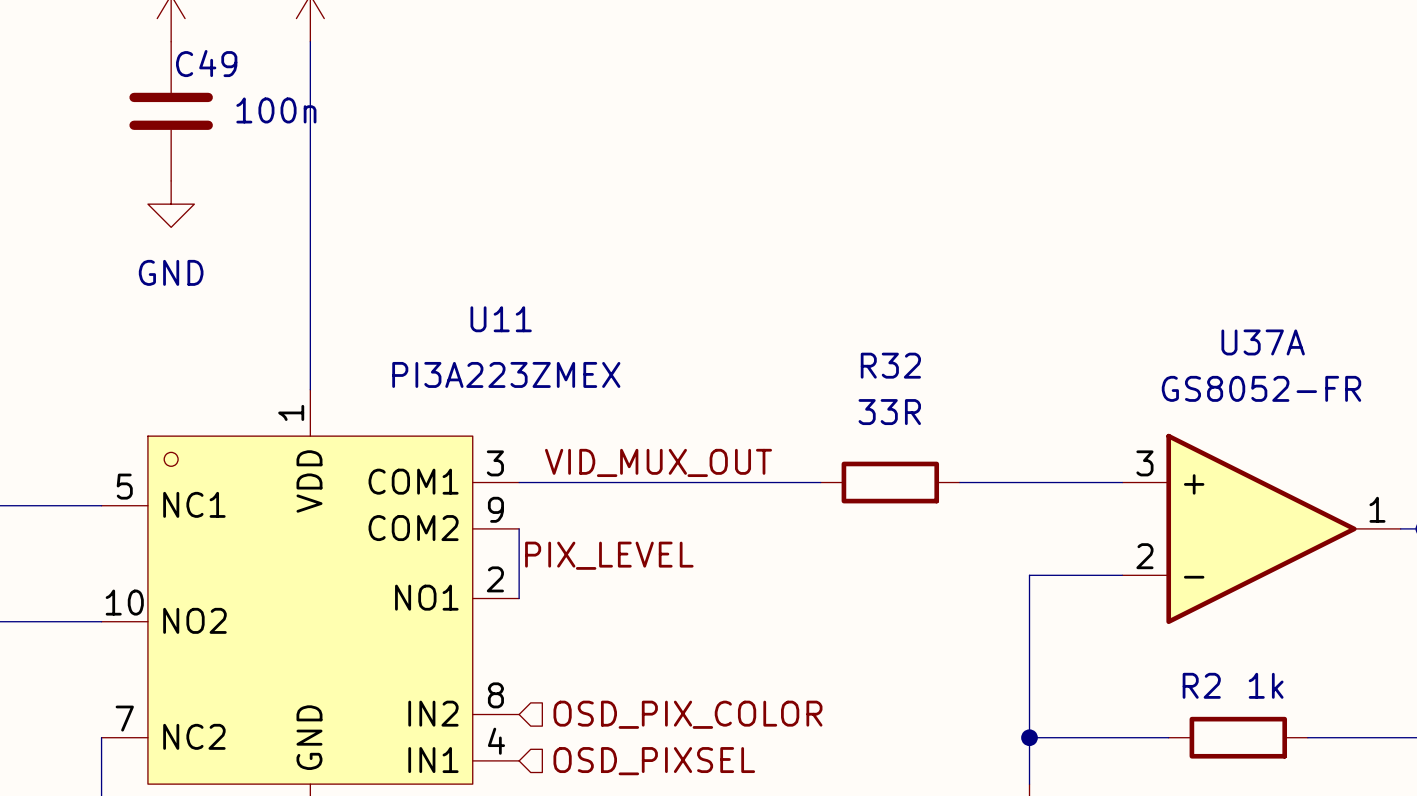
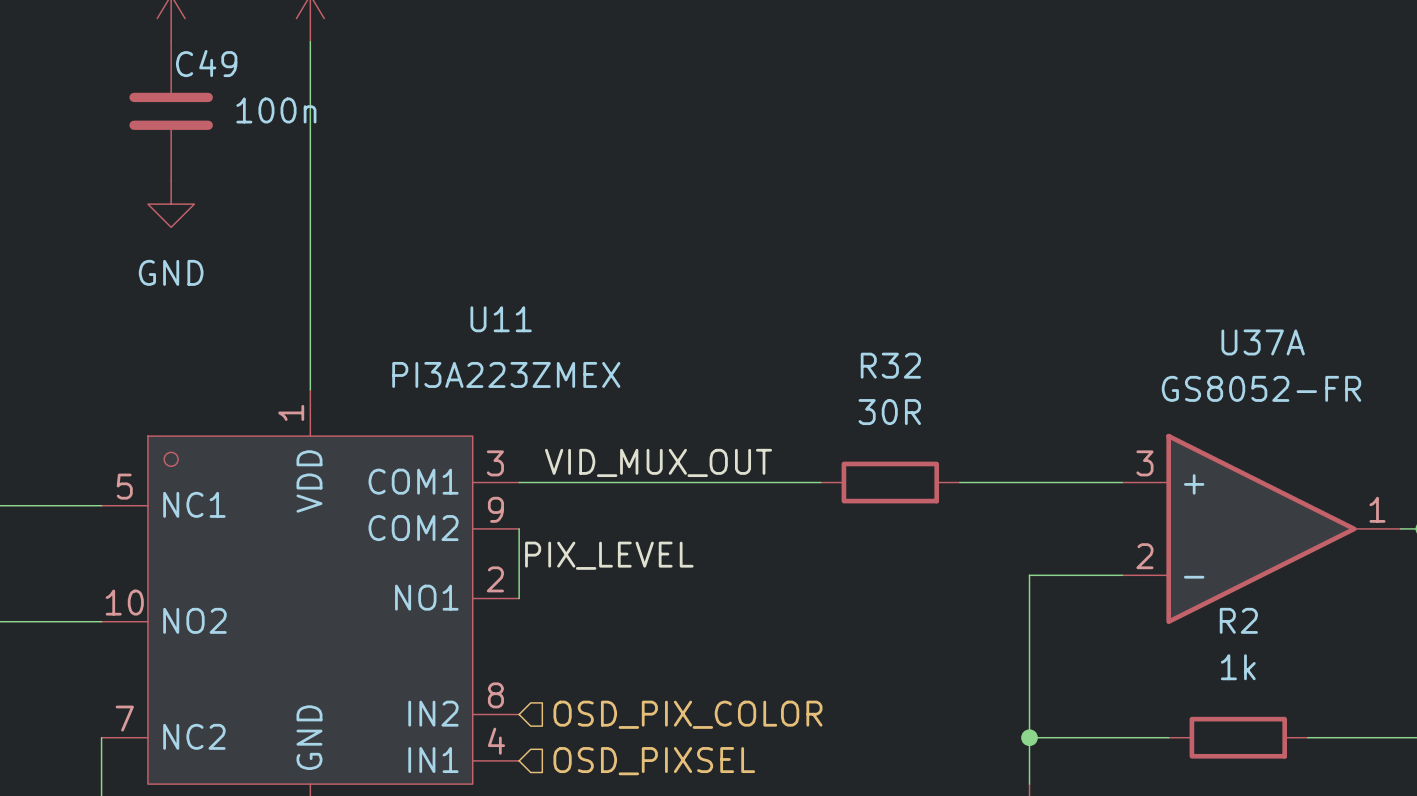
R32 value: 33R (889, 412) -> 30R (889, 412)
R2 name position: R2 (1201, 685) -> R2 (1238, 620)
R2 value position: 1k (1266, 685) -> 1k (1238, 667)

